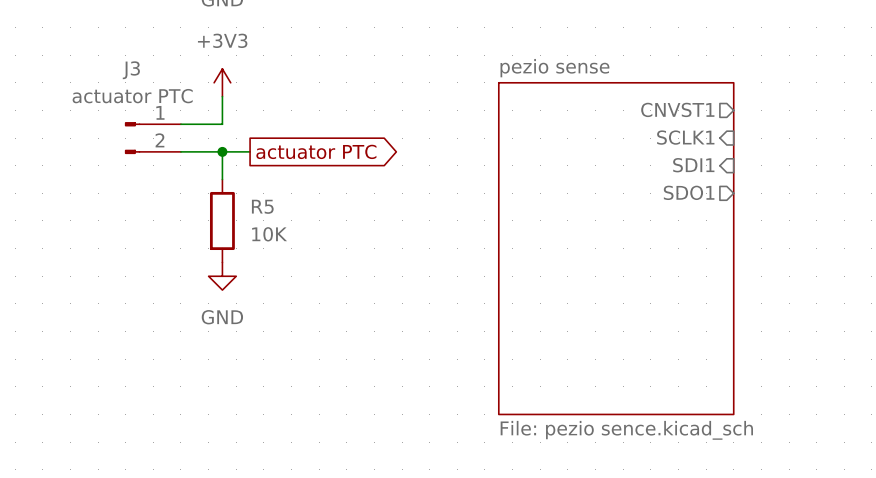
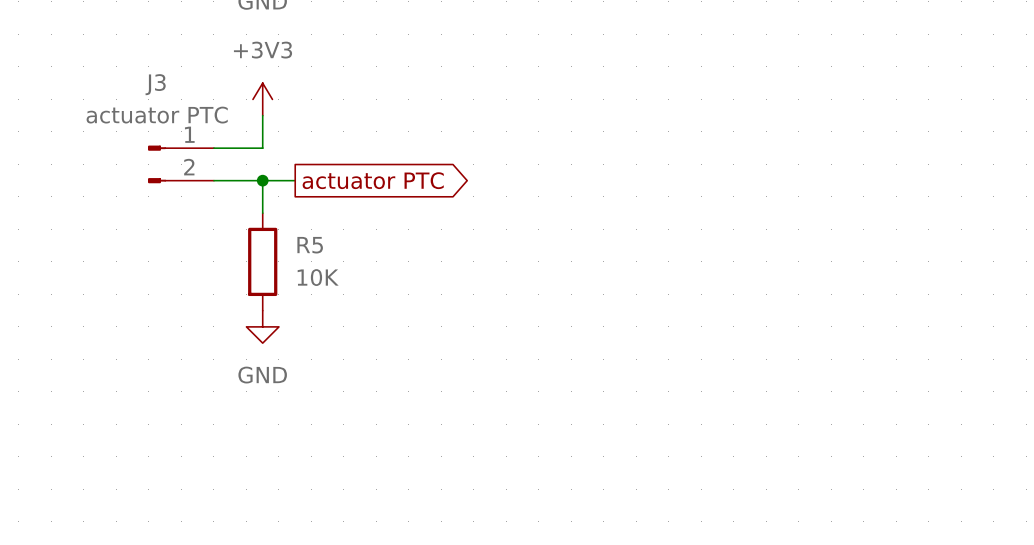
sheet pin: CNVST1 (677, 109) -> none
sheet pin: SCLK1 (685, 137) -> none
sheet pin: SDI1 (693, 165) -> none
sheet pin: SDO1 (689, 192) -> none
sheet pezio sense: File: pezio sence.kicad_sch (616, 248) -> none

